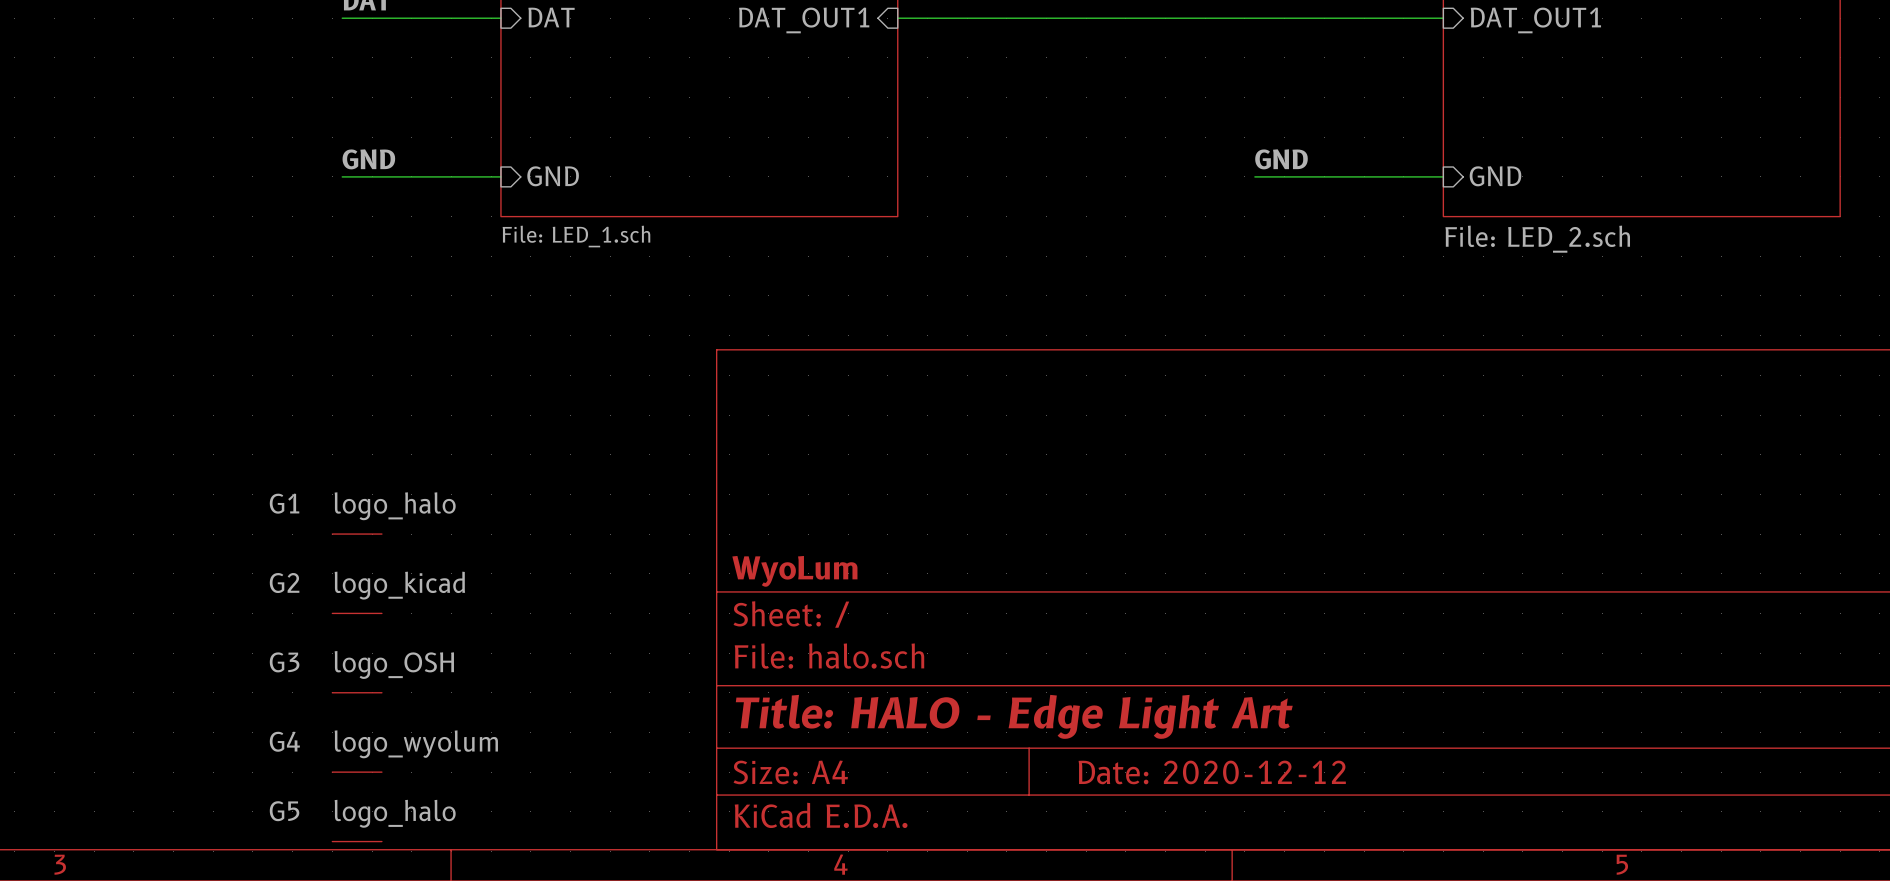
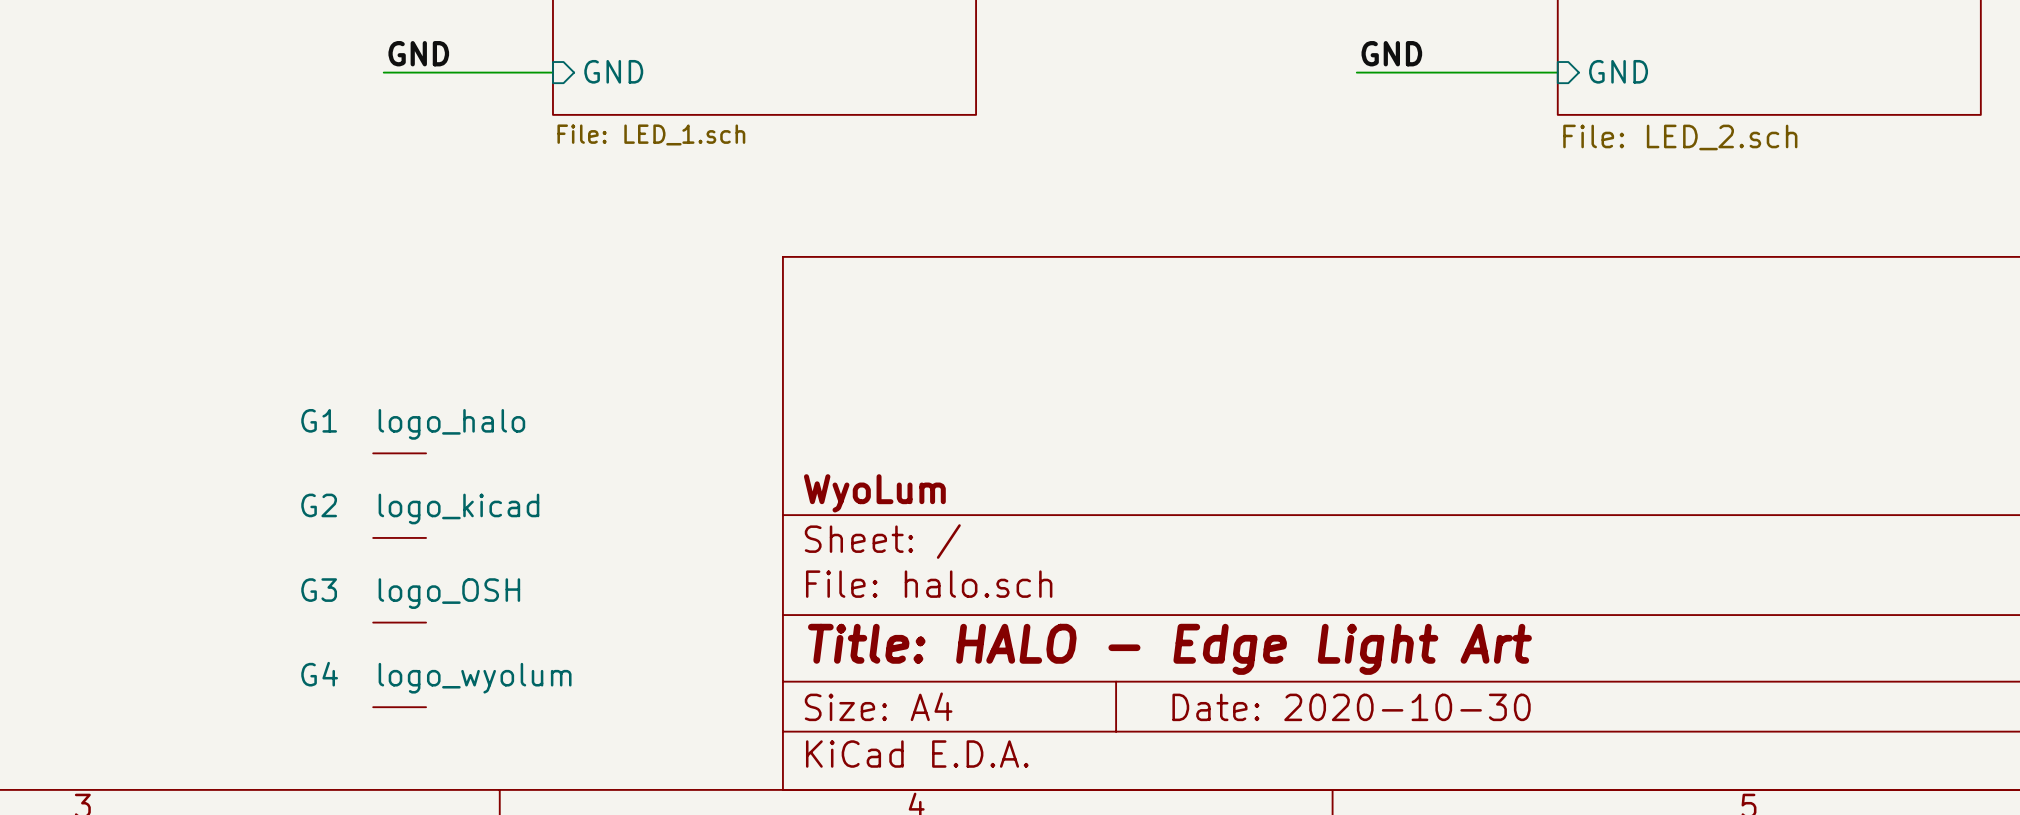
title block: Date: 2020-12-12 (1212, 772) -> Date: 2020-10-30 (1351, 707)
G5: logo_halo (357, 841) -> none

